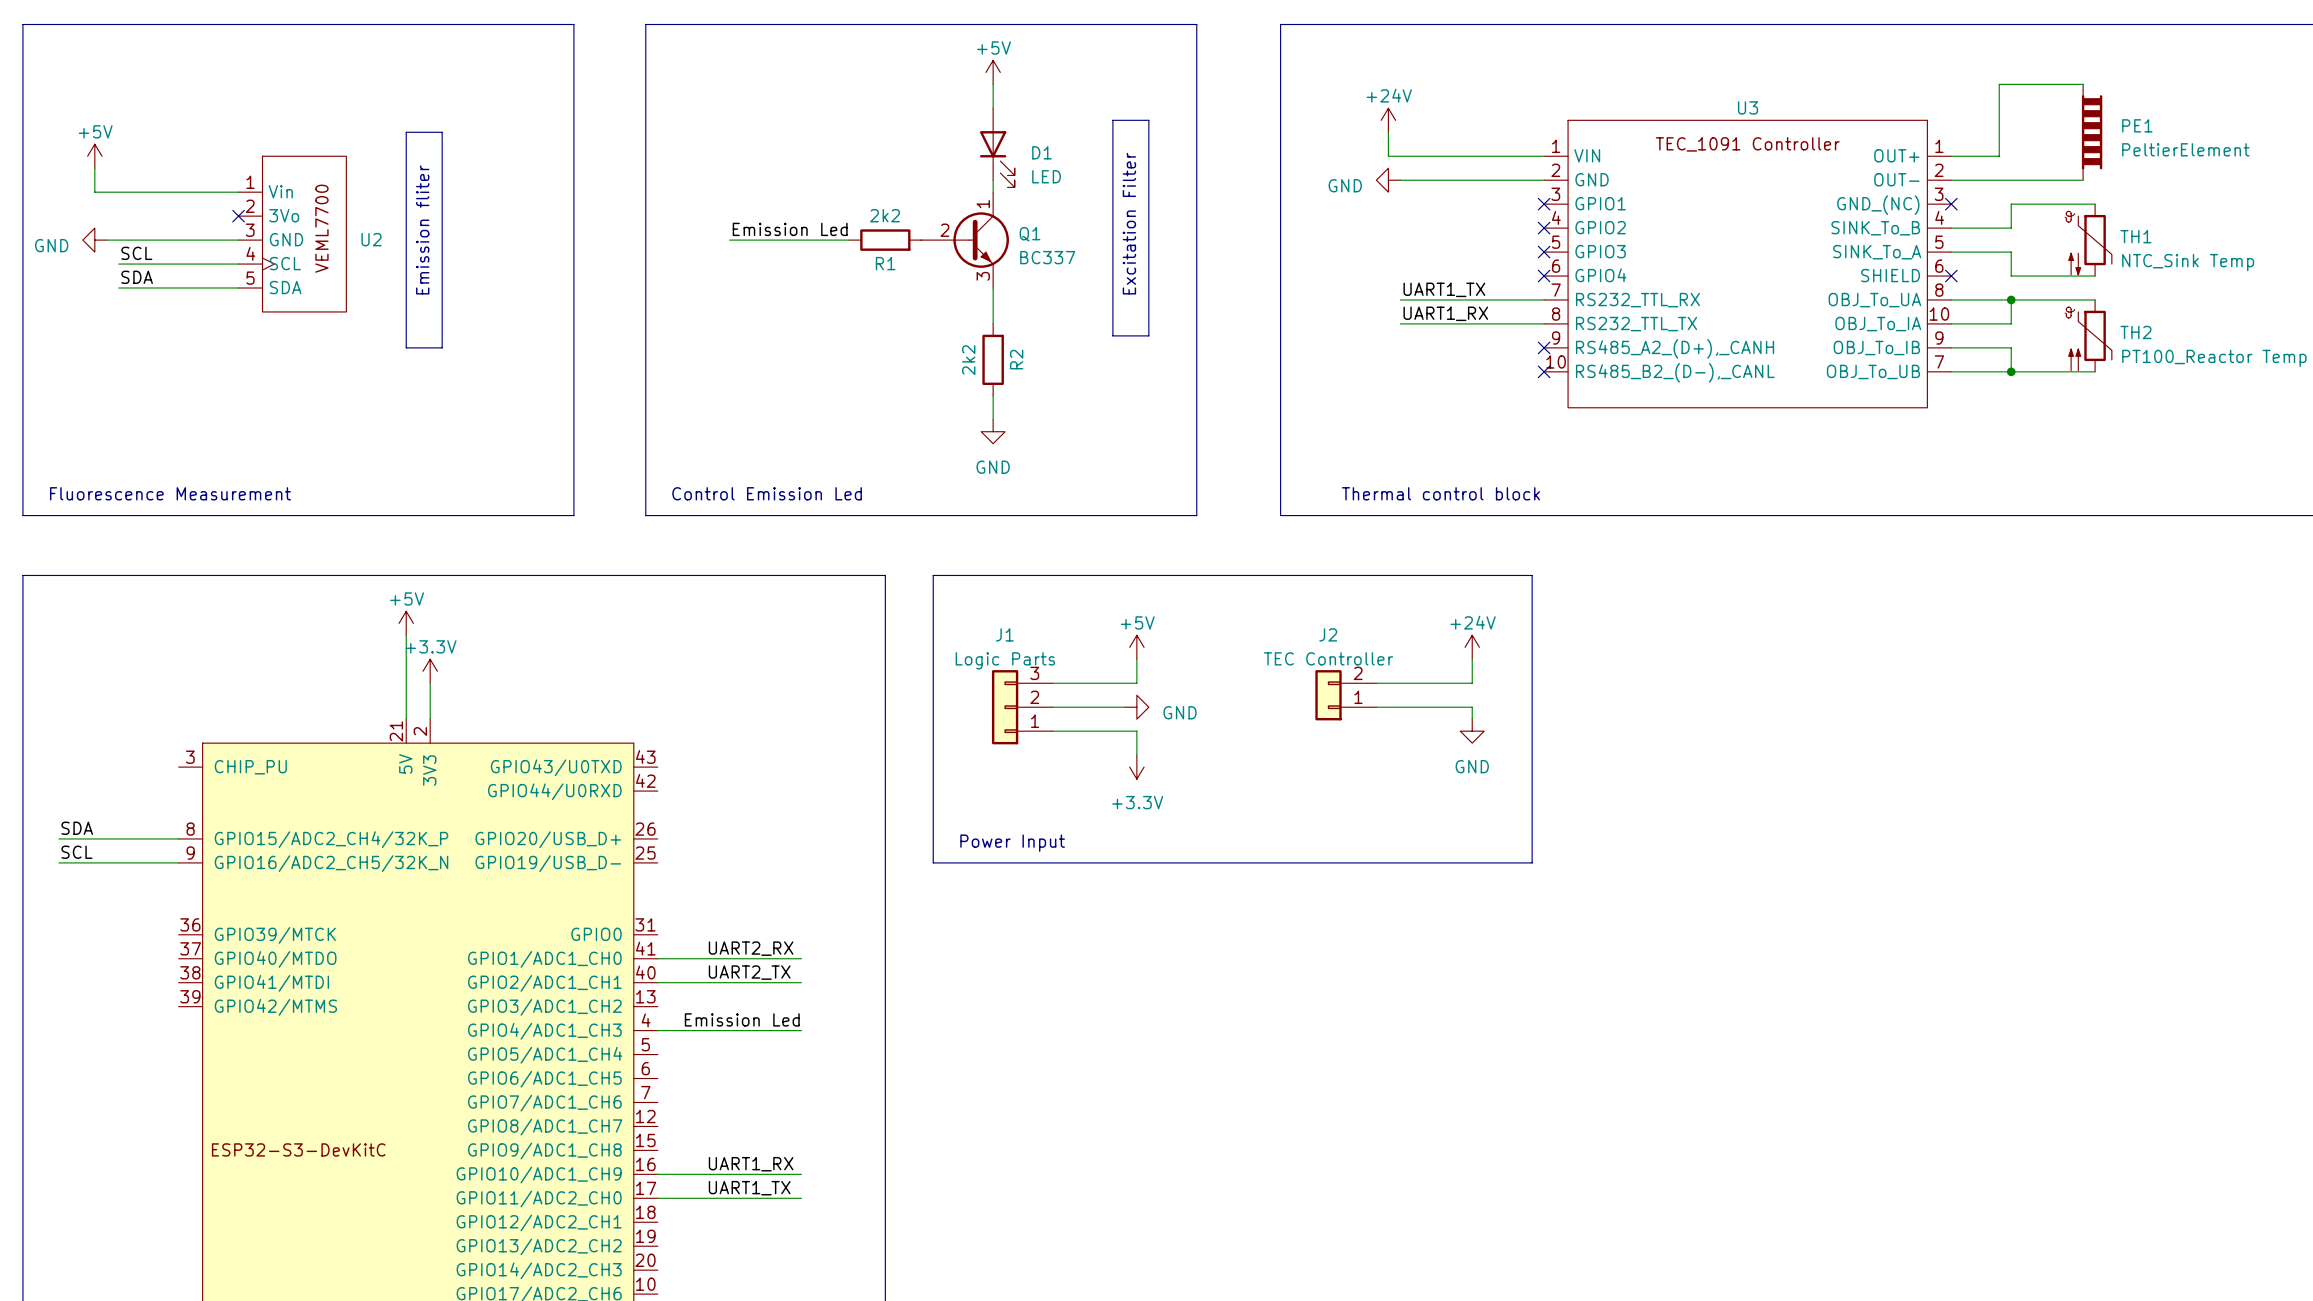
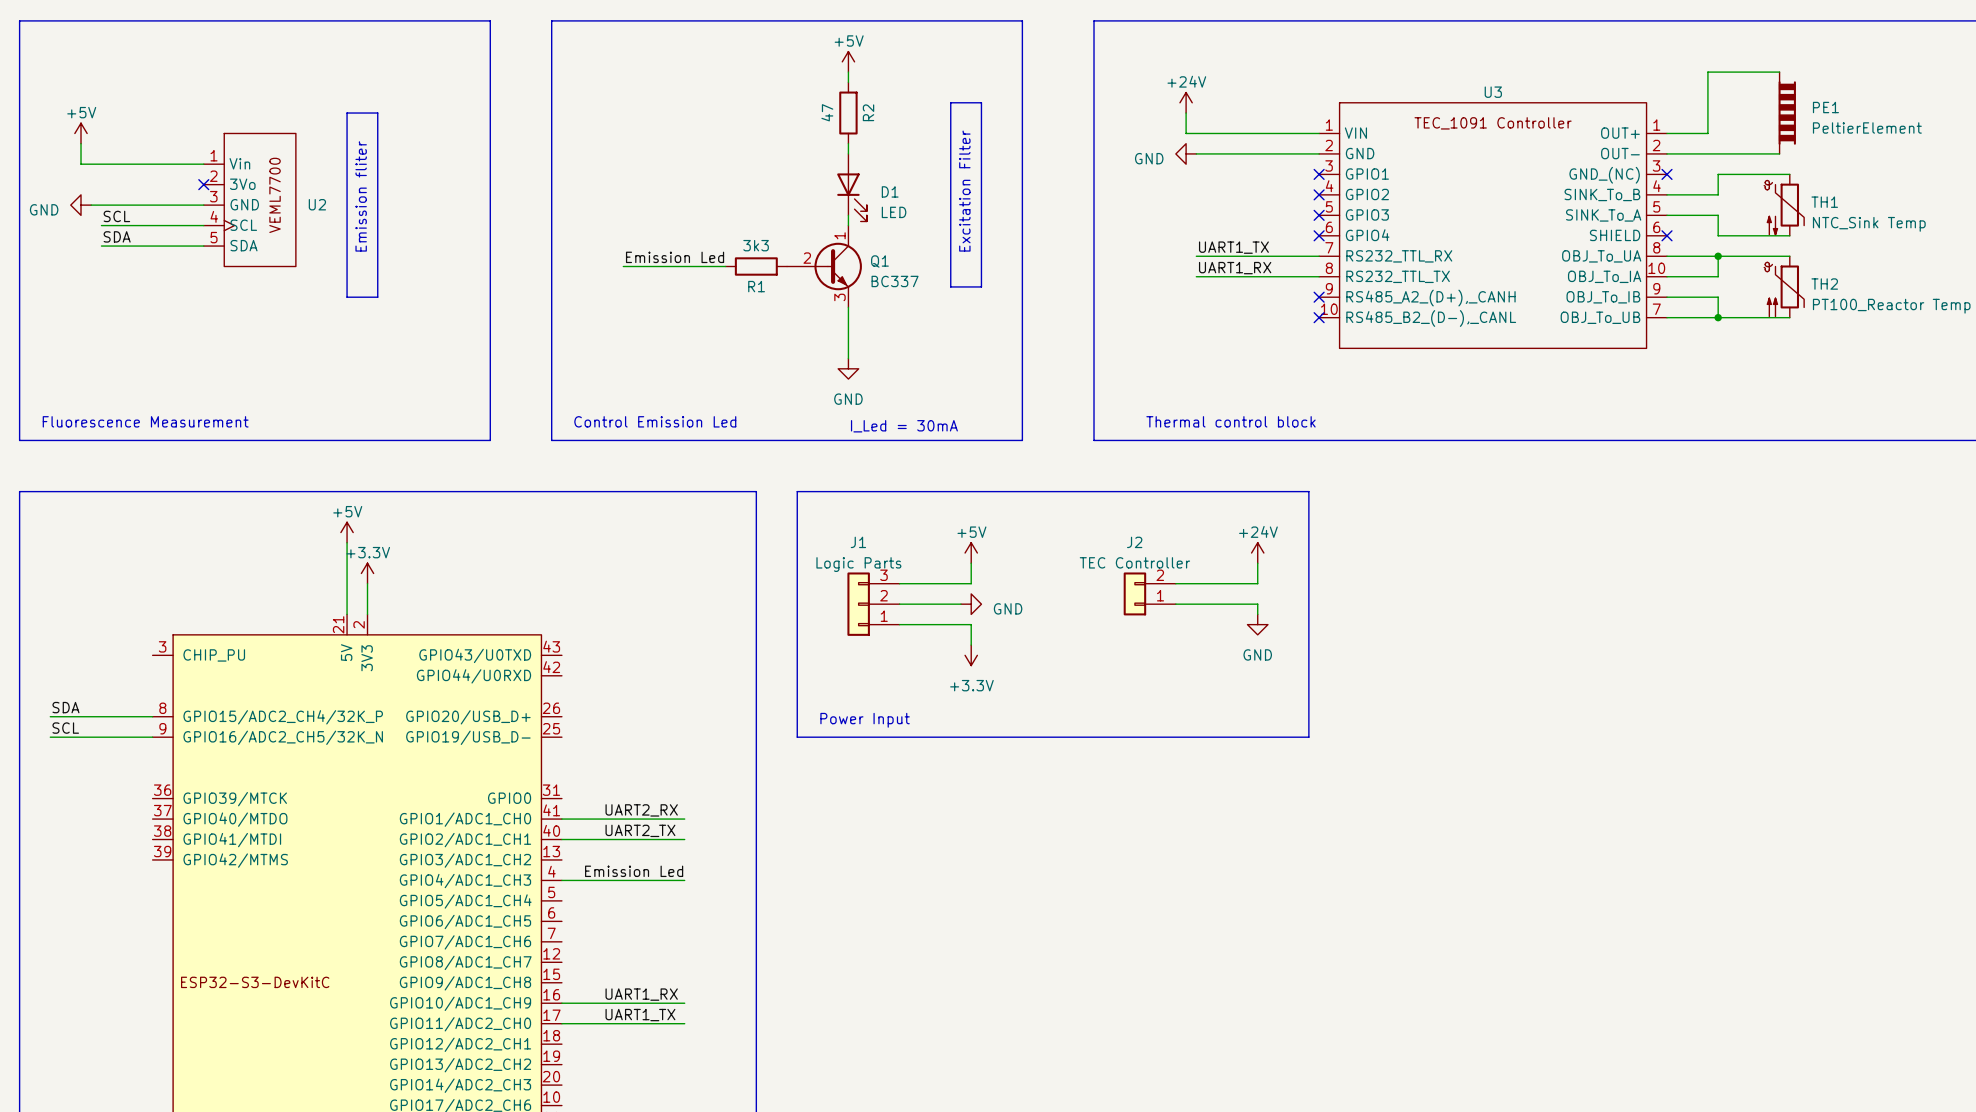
D1 position: (997, 147) -> (852, 187)
R1 value: 2k2 (885, 215) -> 3k3 (756, 245)
label position: Emission Led (790, 229) -> Emission Led (675, 257)
wire: (729, 240) (849, 240) -> (623, 266) (725, 266)
R1 position: (885, 240) -> (756, 266)
Q1 position: (965, 240) -> (824, 266)
wire: (993, 288) (993, 323) -> (848, 307) (848, 338)
R2 position: (993, 359) -> (848, 113)
R2 value: 2k2 (968, 360) -> 47 (827, 112)
text: none -> I_Led = 30mA (904, 426)

